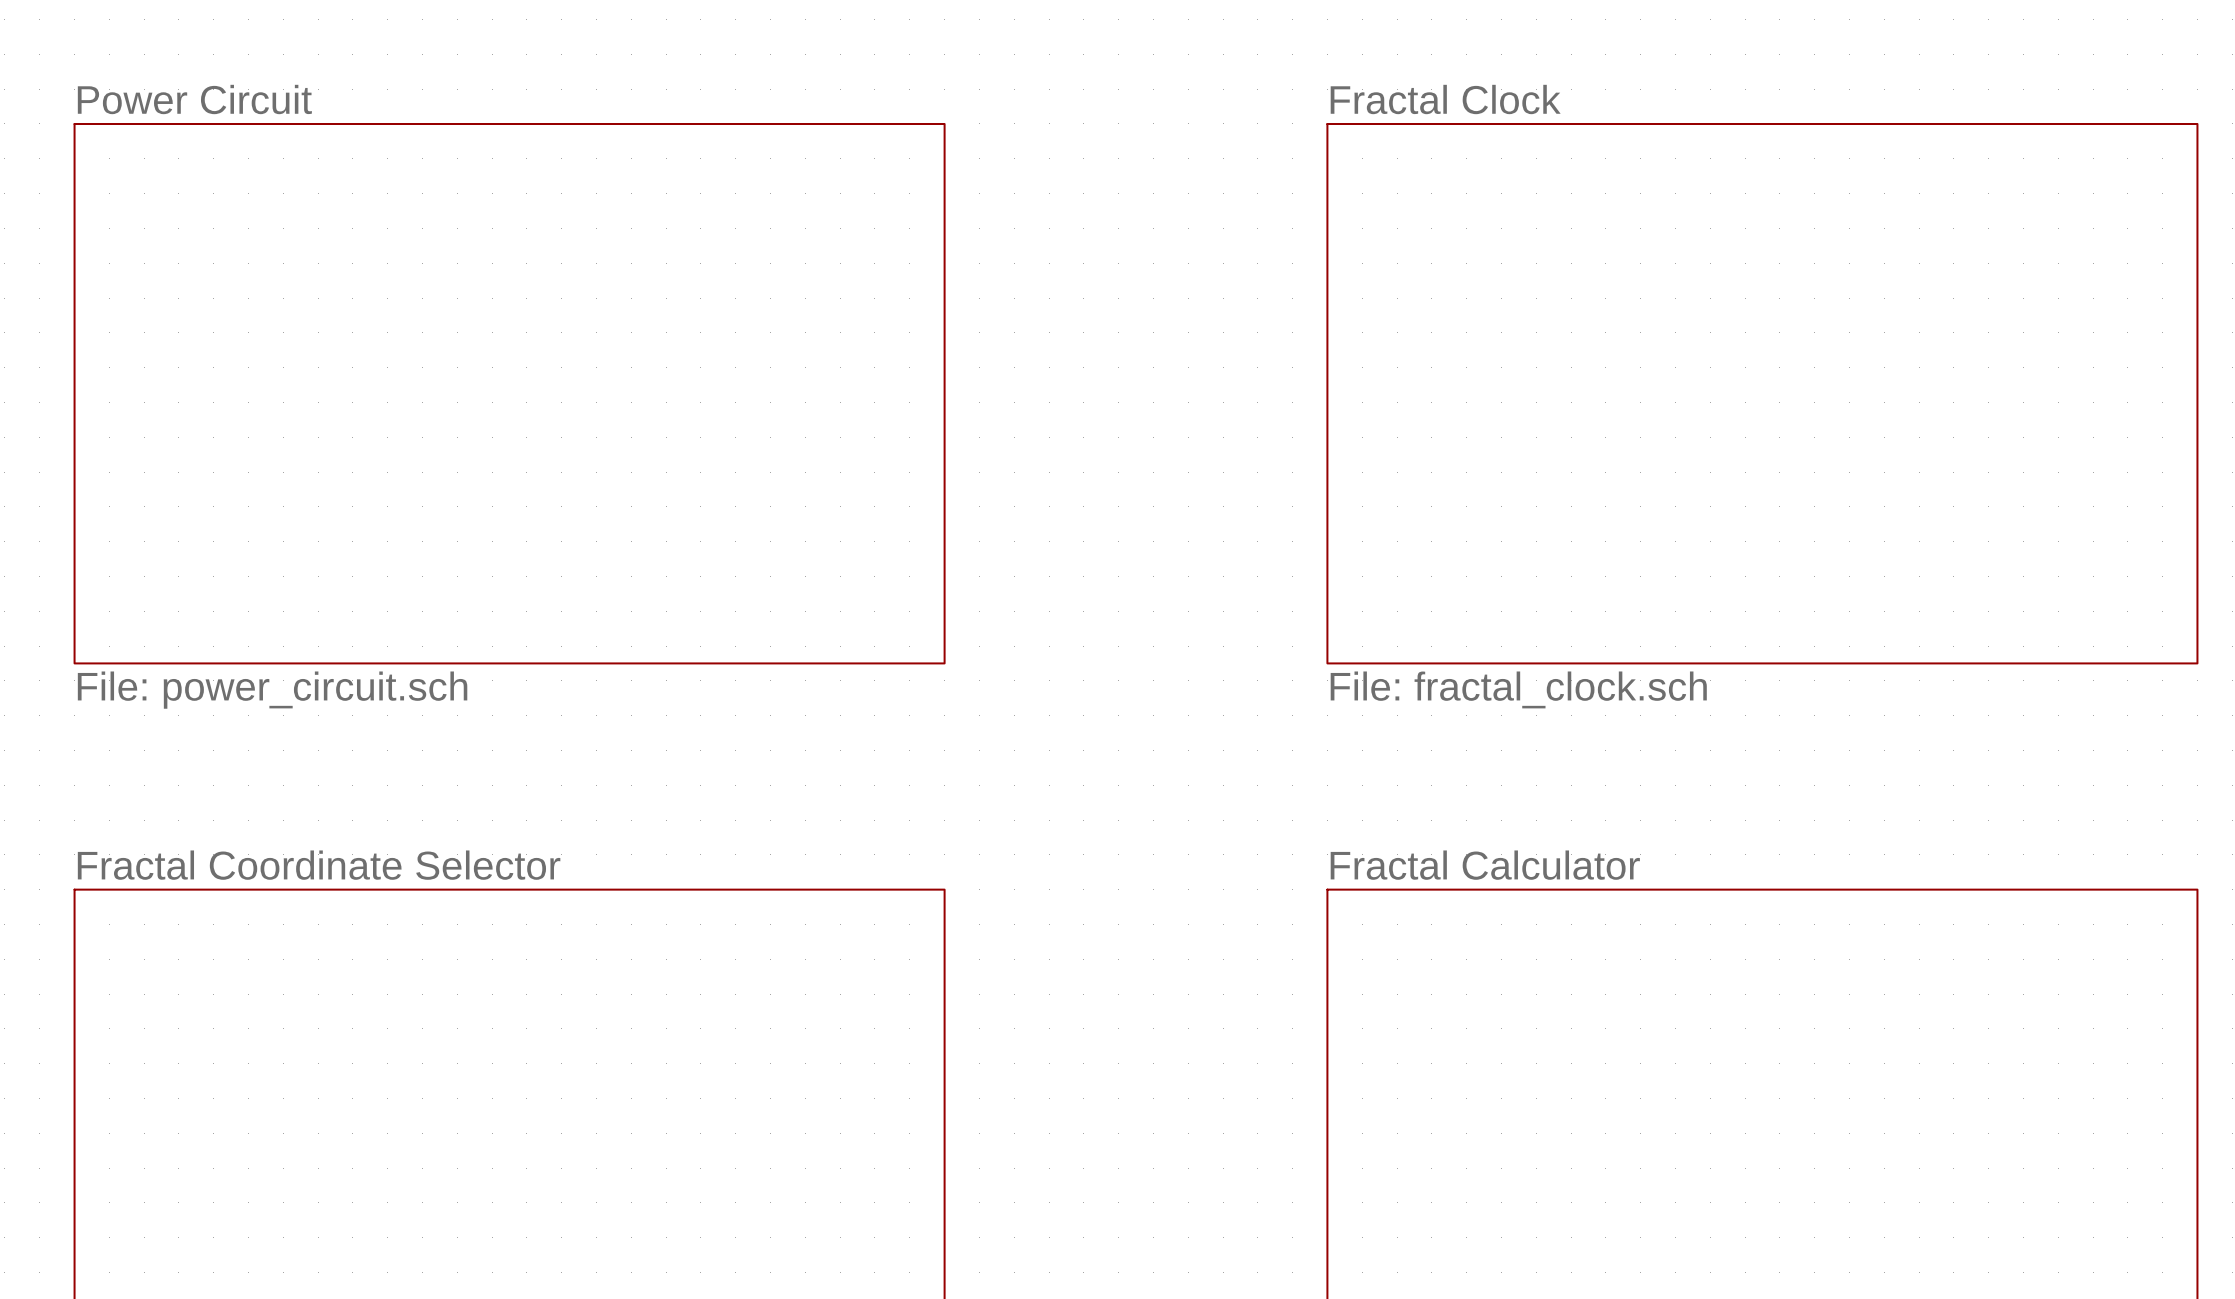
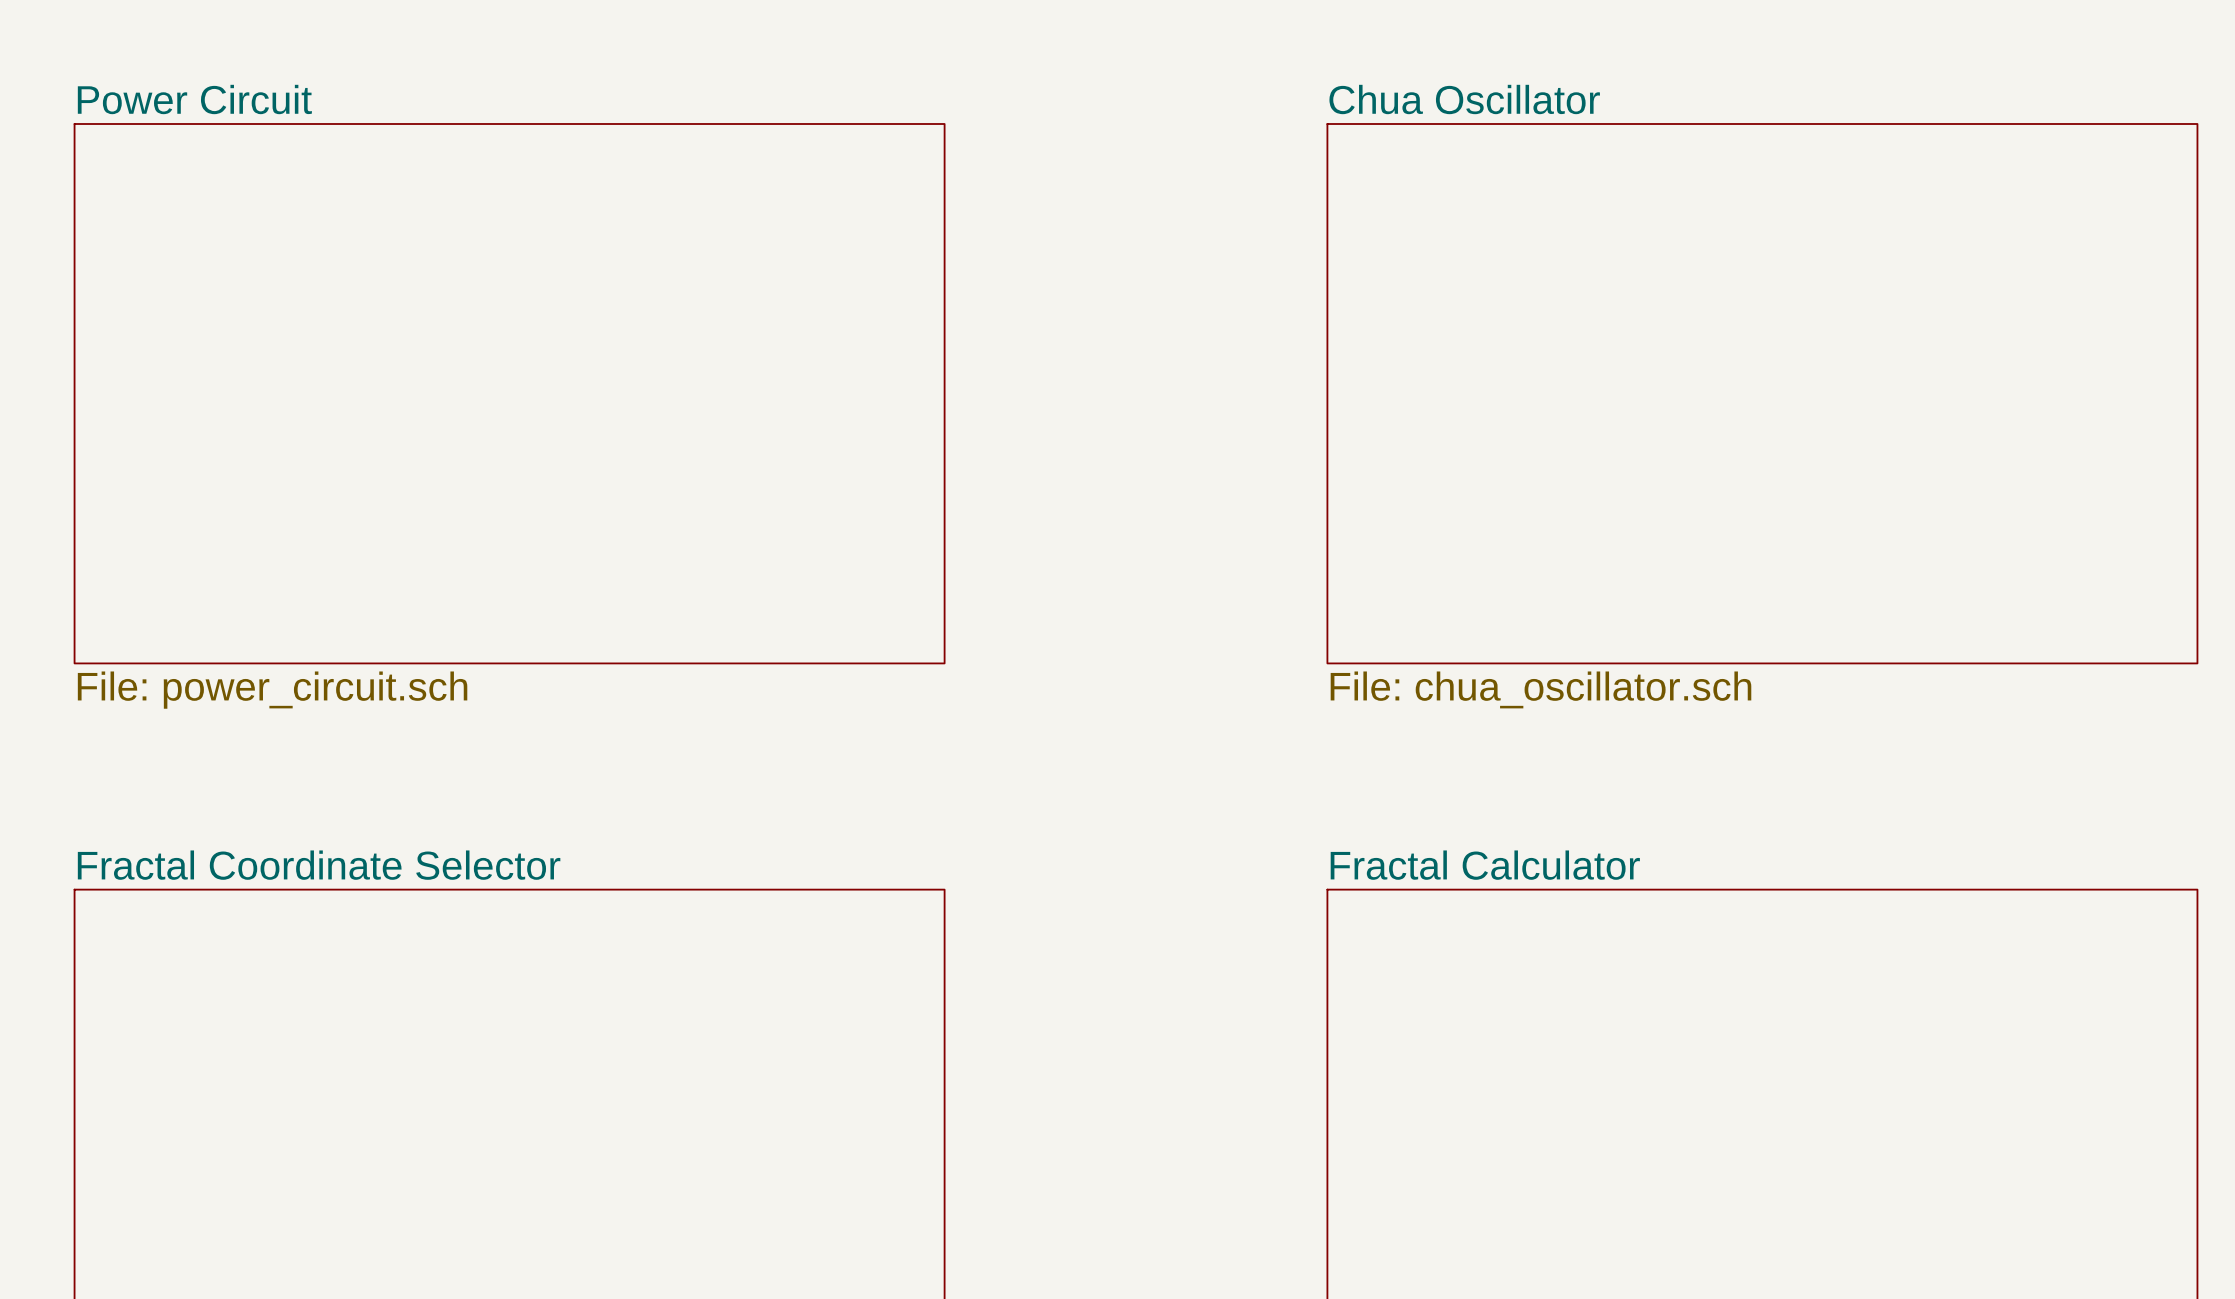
sheet Fractal Clock name: Fractal Clock (1445, 99) -> Chua Oscillator (1464, 99)
sheet Fractal Clock value: File: fractal_clock.sch (1518, 689) -> File: chua_oscillator.sch (1540, 689)

